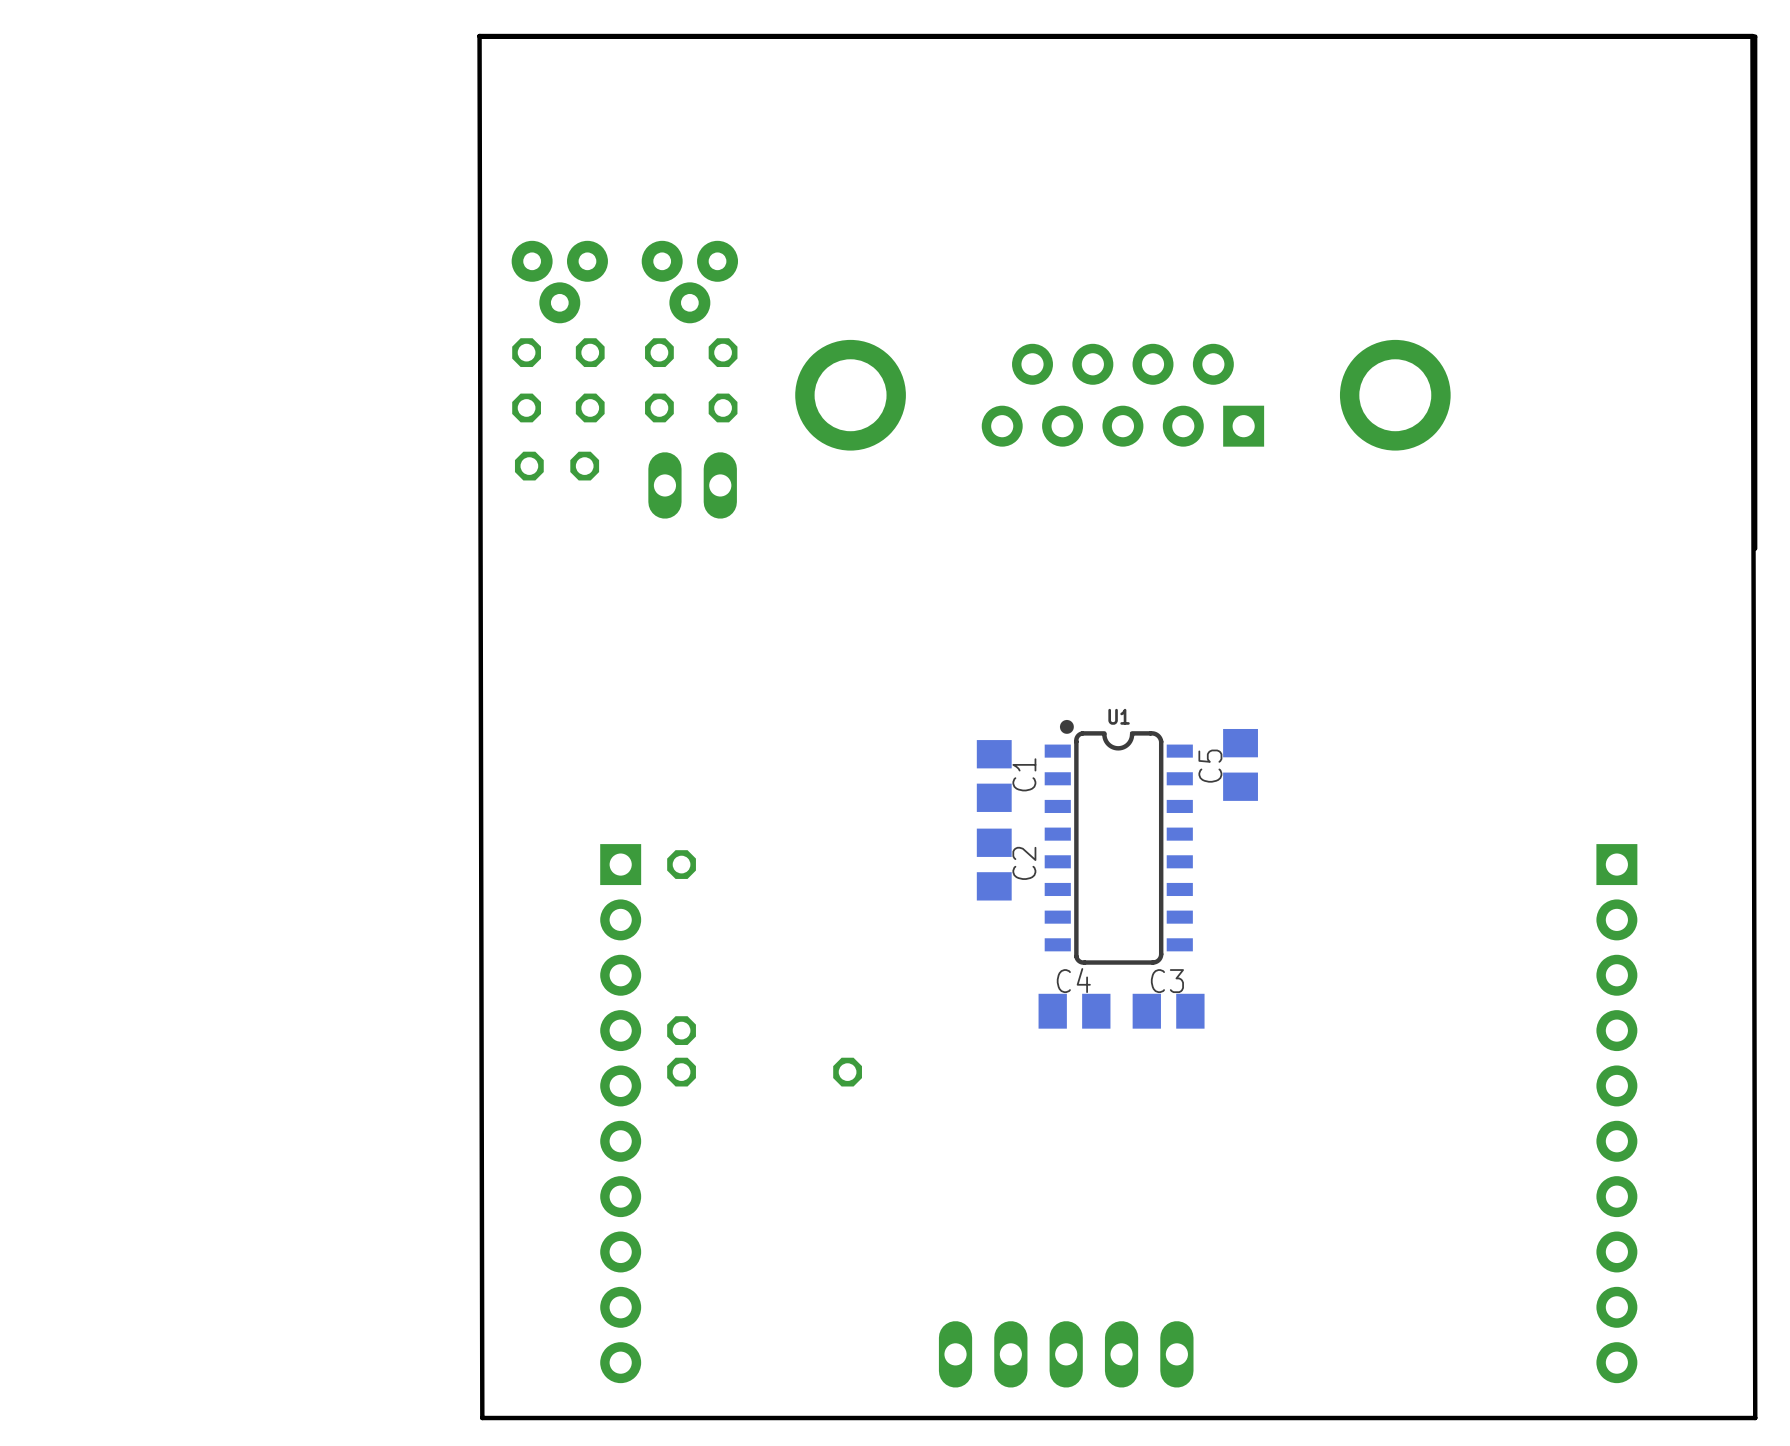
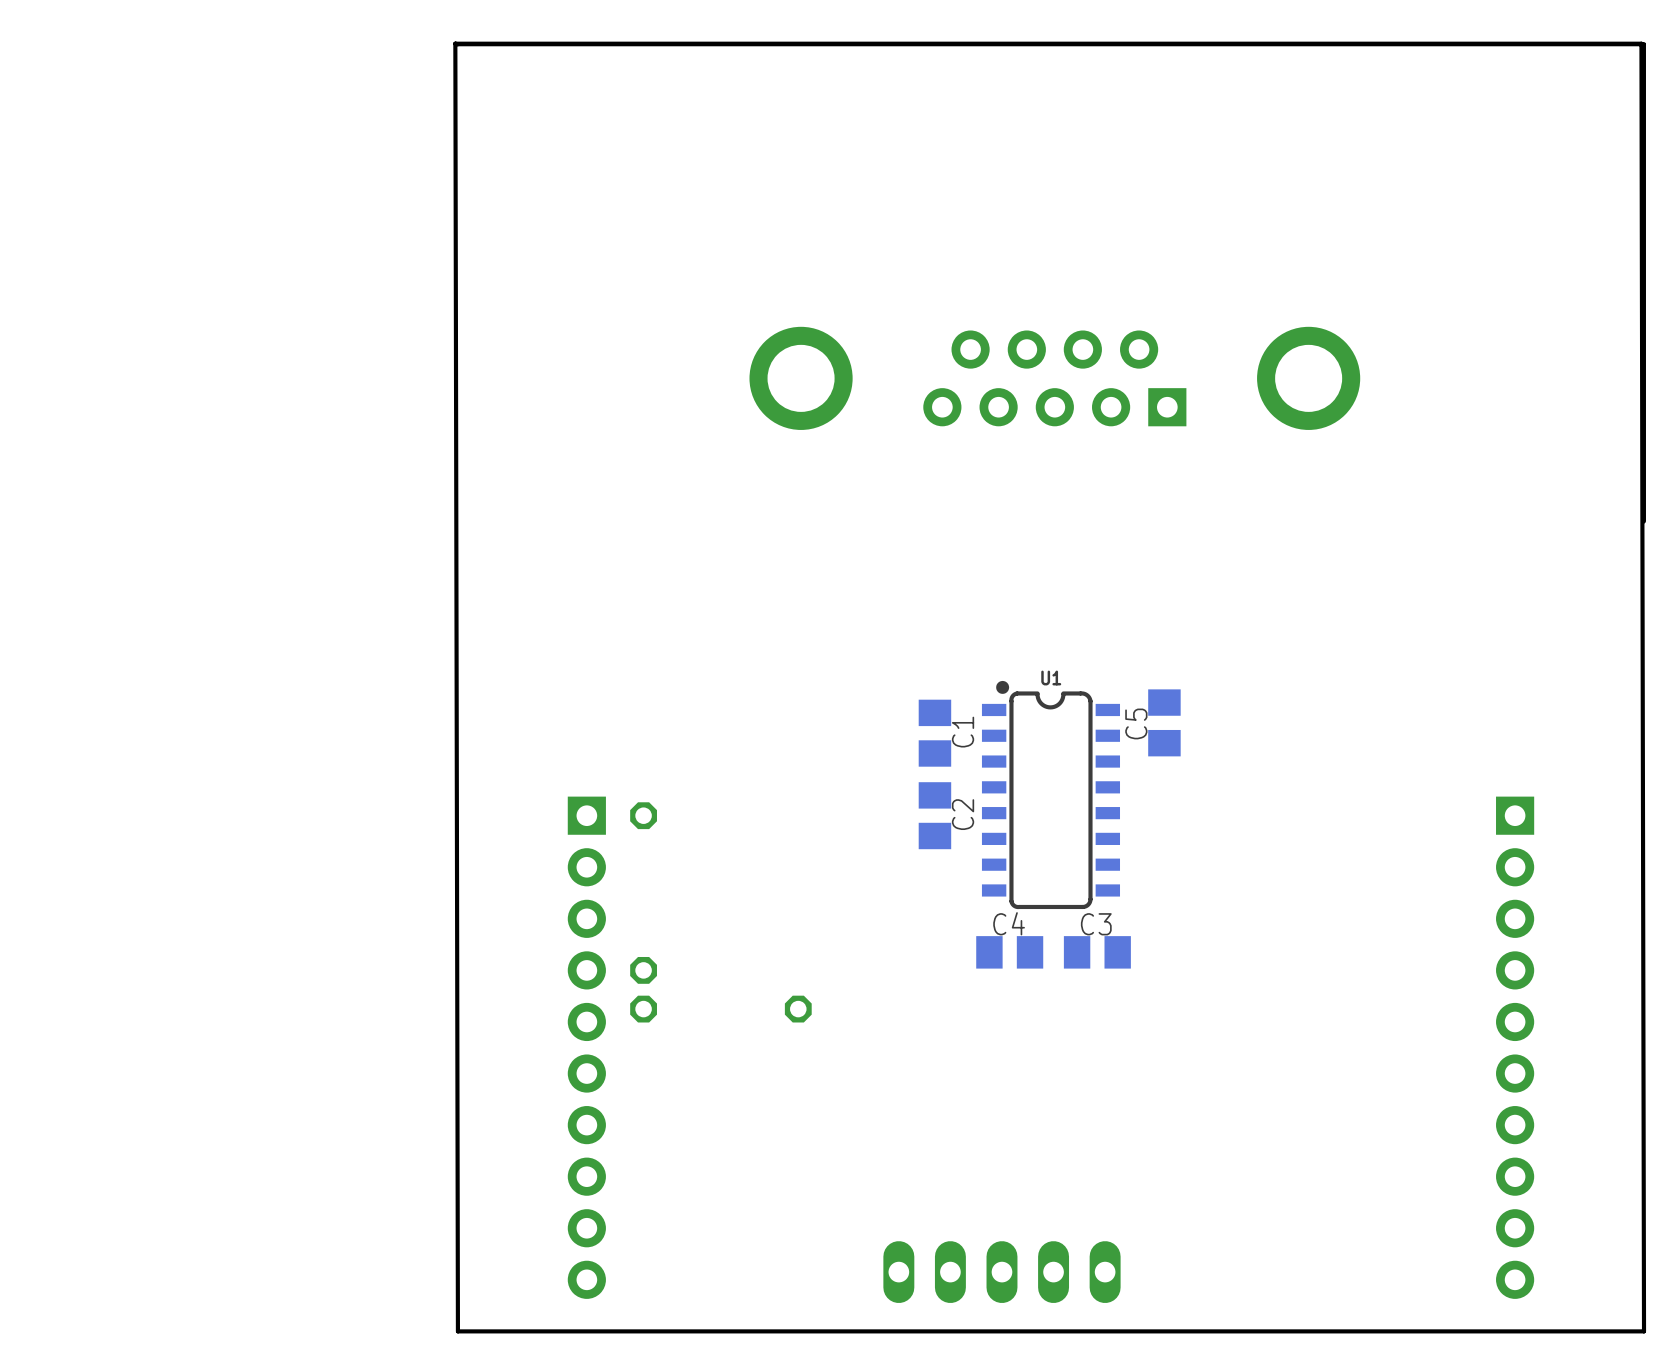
part: (559, 282) -> none
part: (689, 282) -> none
part: (526, 380) -> none
part: (590, 380) -> none
part: (659, 380) -> none
part: (723, 380) -> none
part: (557, 466) -> none
part: (692, 485) -> none

